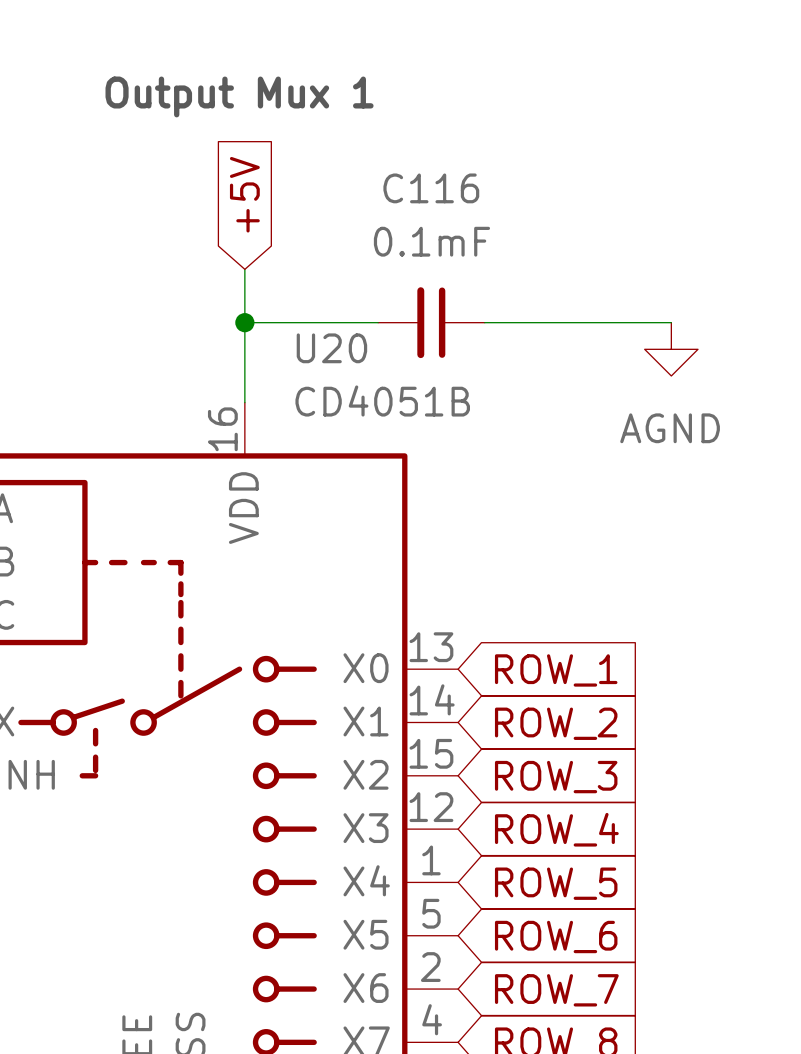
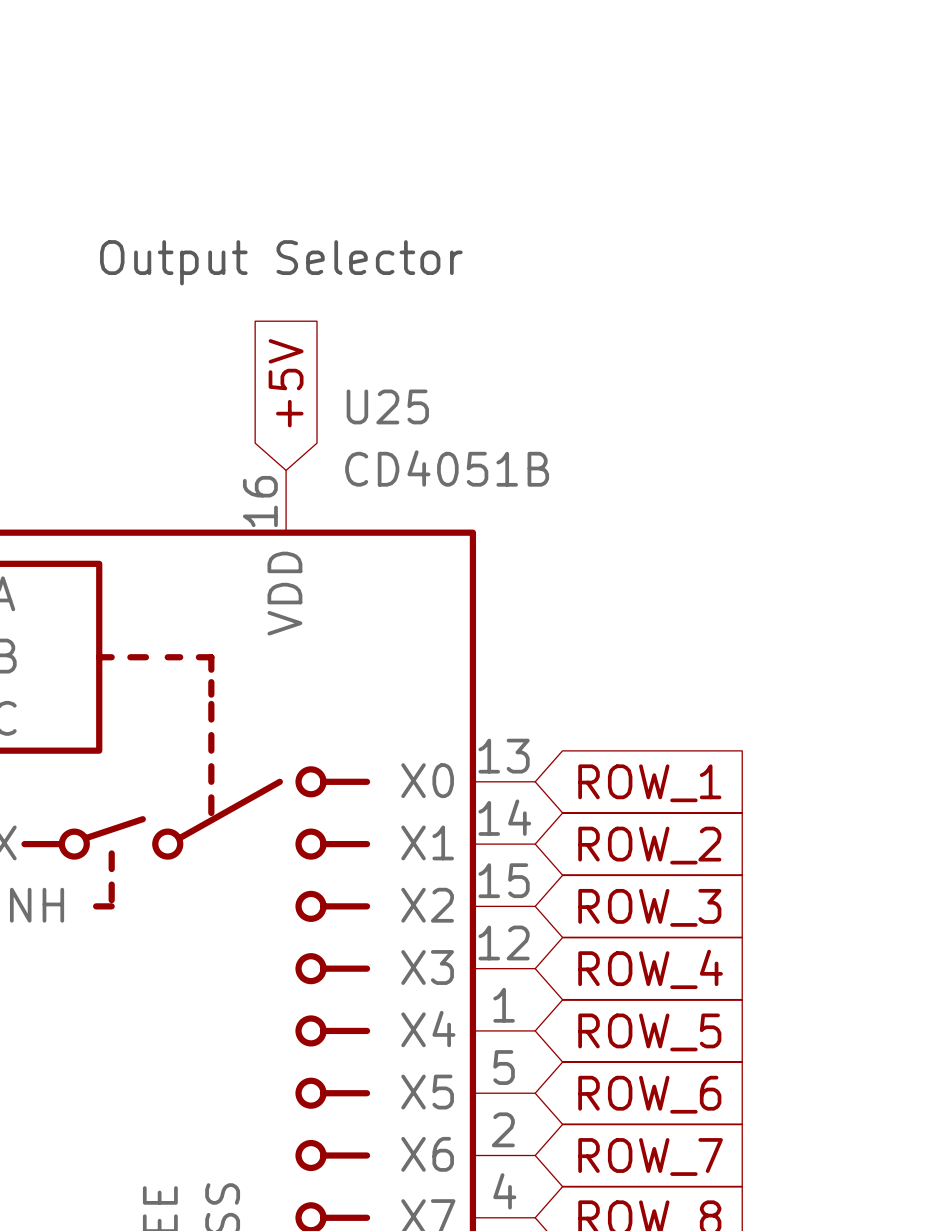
text: Output Mux 1 (239, 96) -> none
global label position: +5V (244, 194) -> +5V (286, 383)
text: none -> Output Selector (281, 262)
wire: (244, 269) (244, 402) -> none
wire: (244, 322) (378, 322) -> none
junction: (244, 322) -> none
C116: 0.1mF (431, 322) -> none
wire: (484, 322) (671, 322) -> none
U20 name: U20 (331, 348) -> U25 (387, 406)
power symbol: AGND (671, 349) -> none

